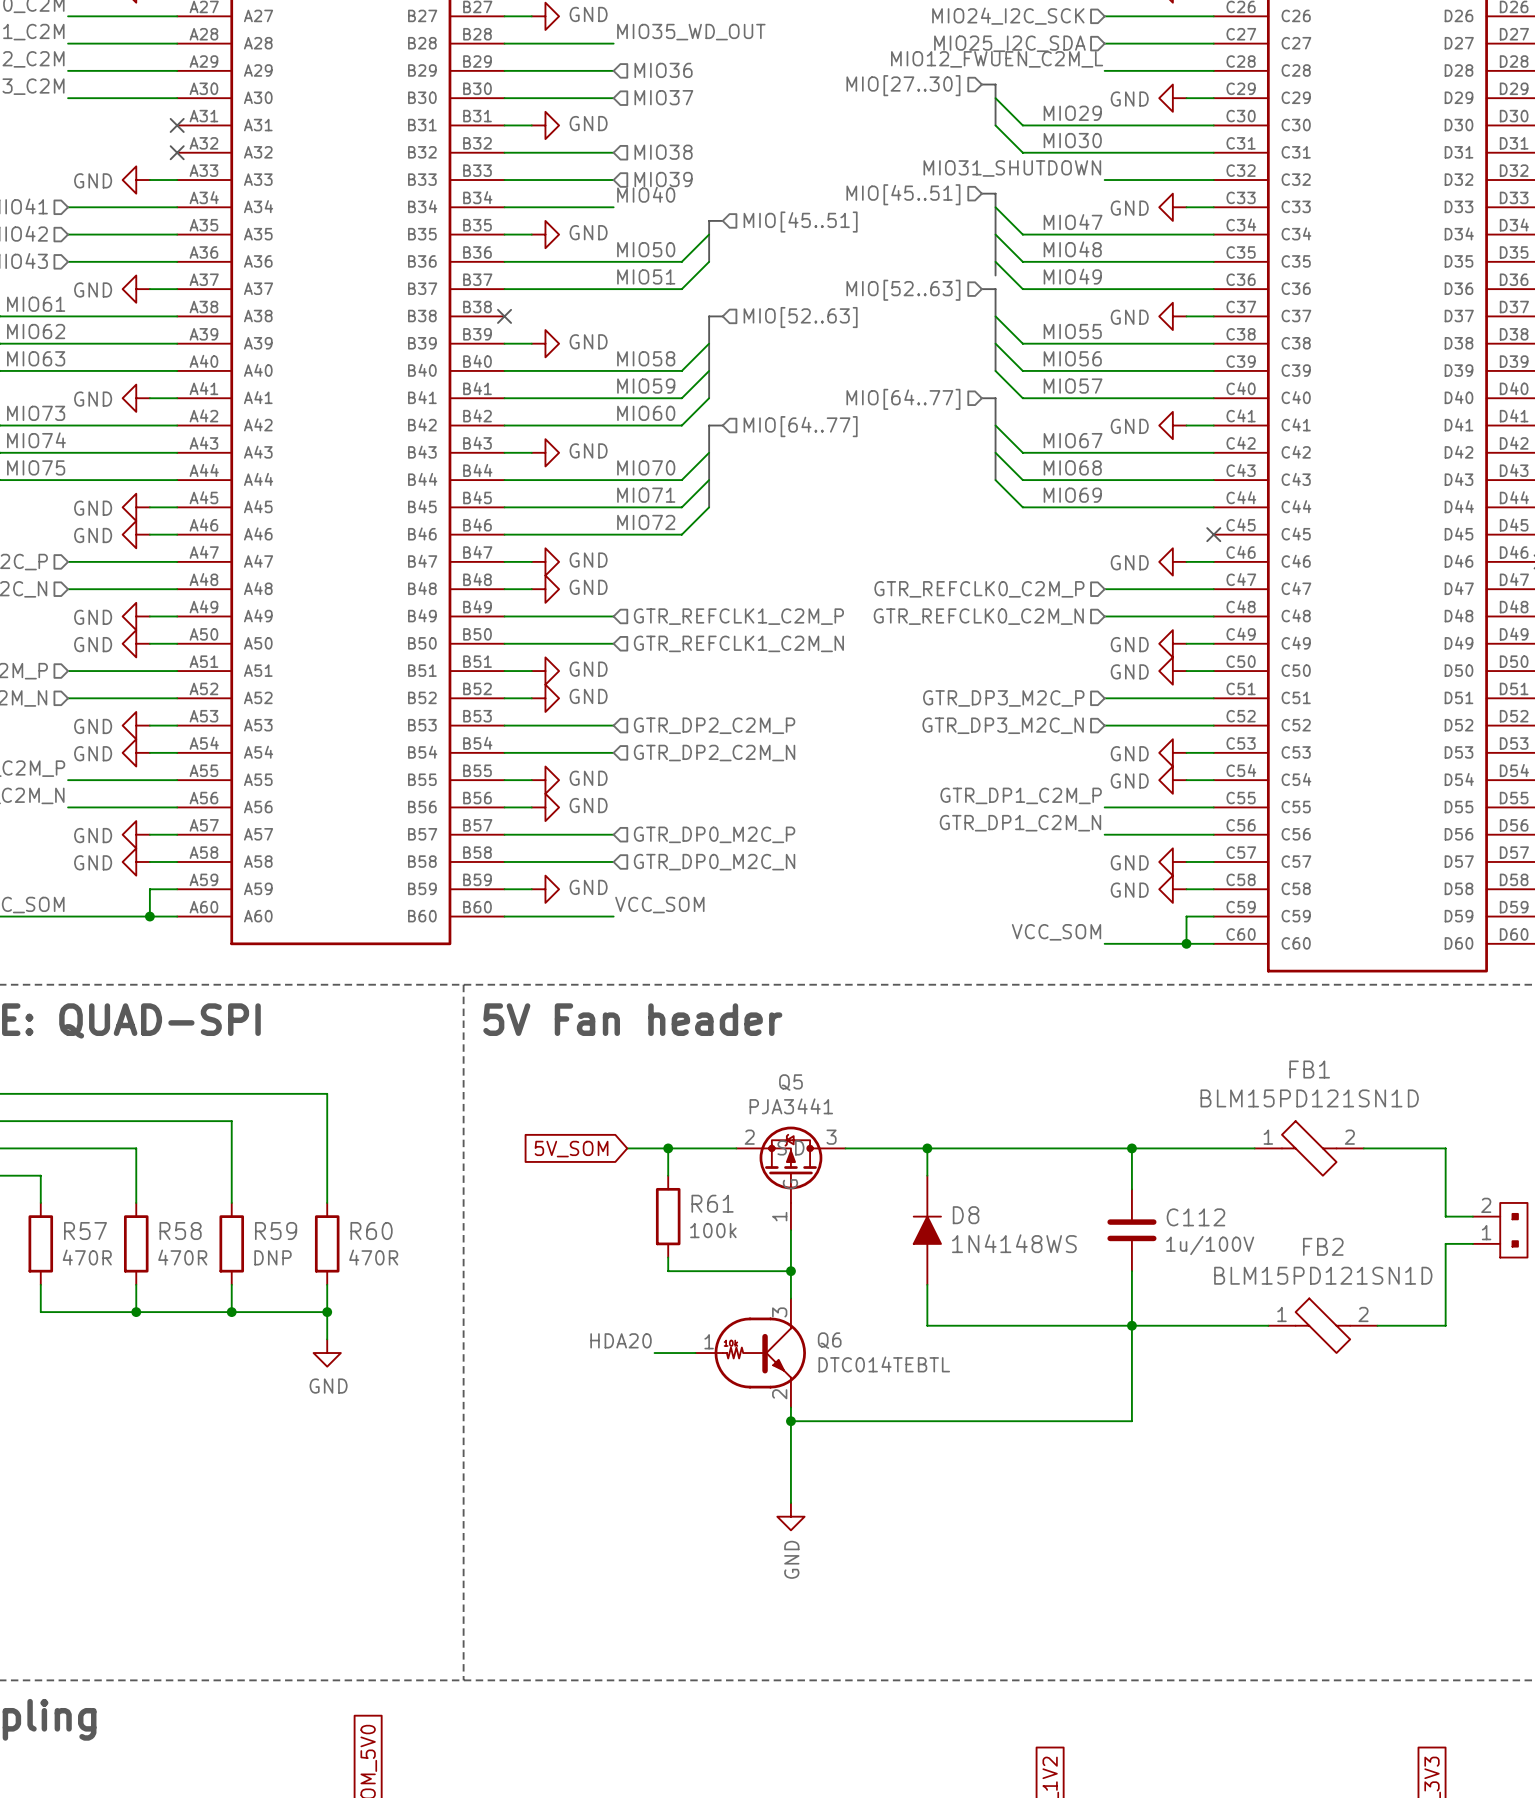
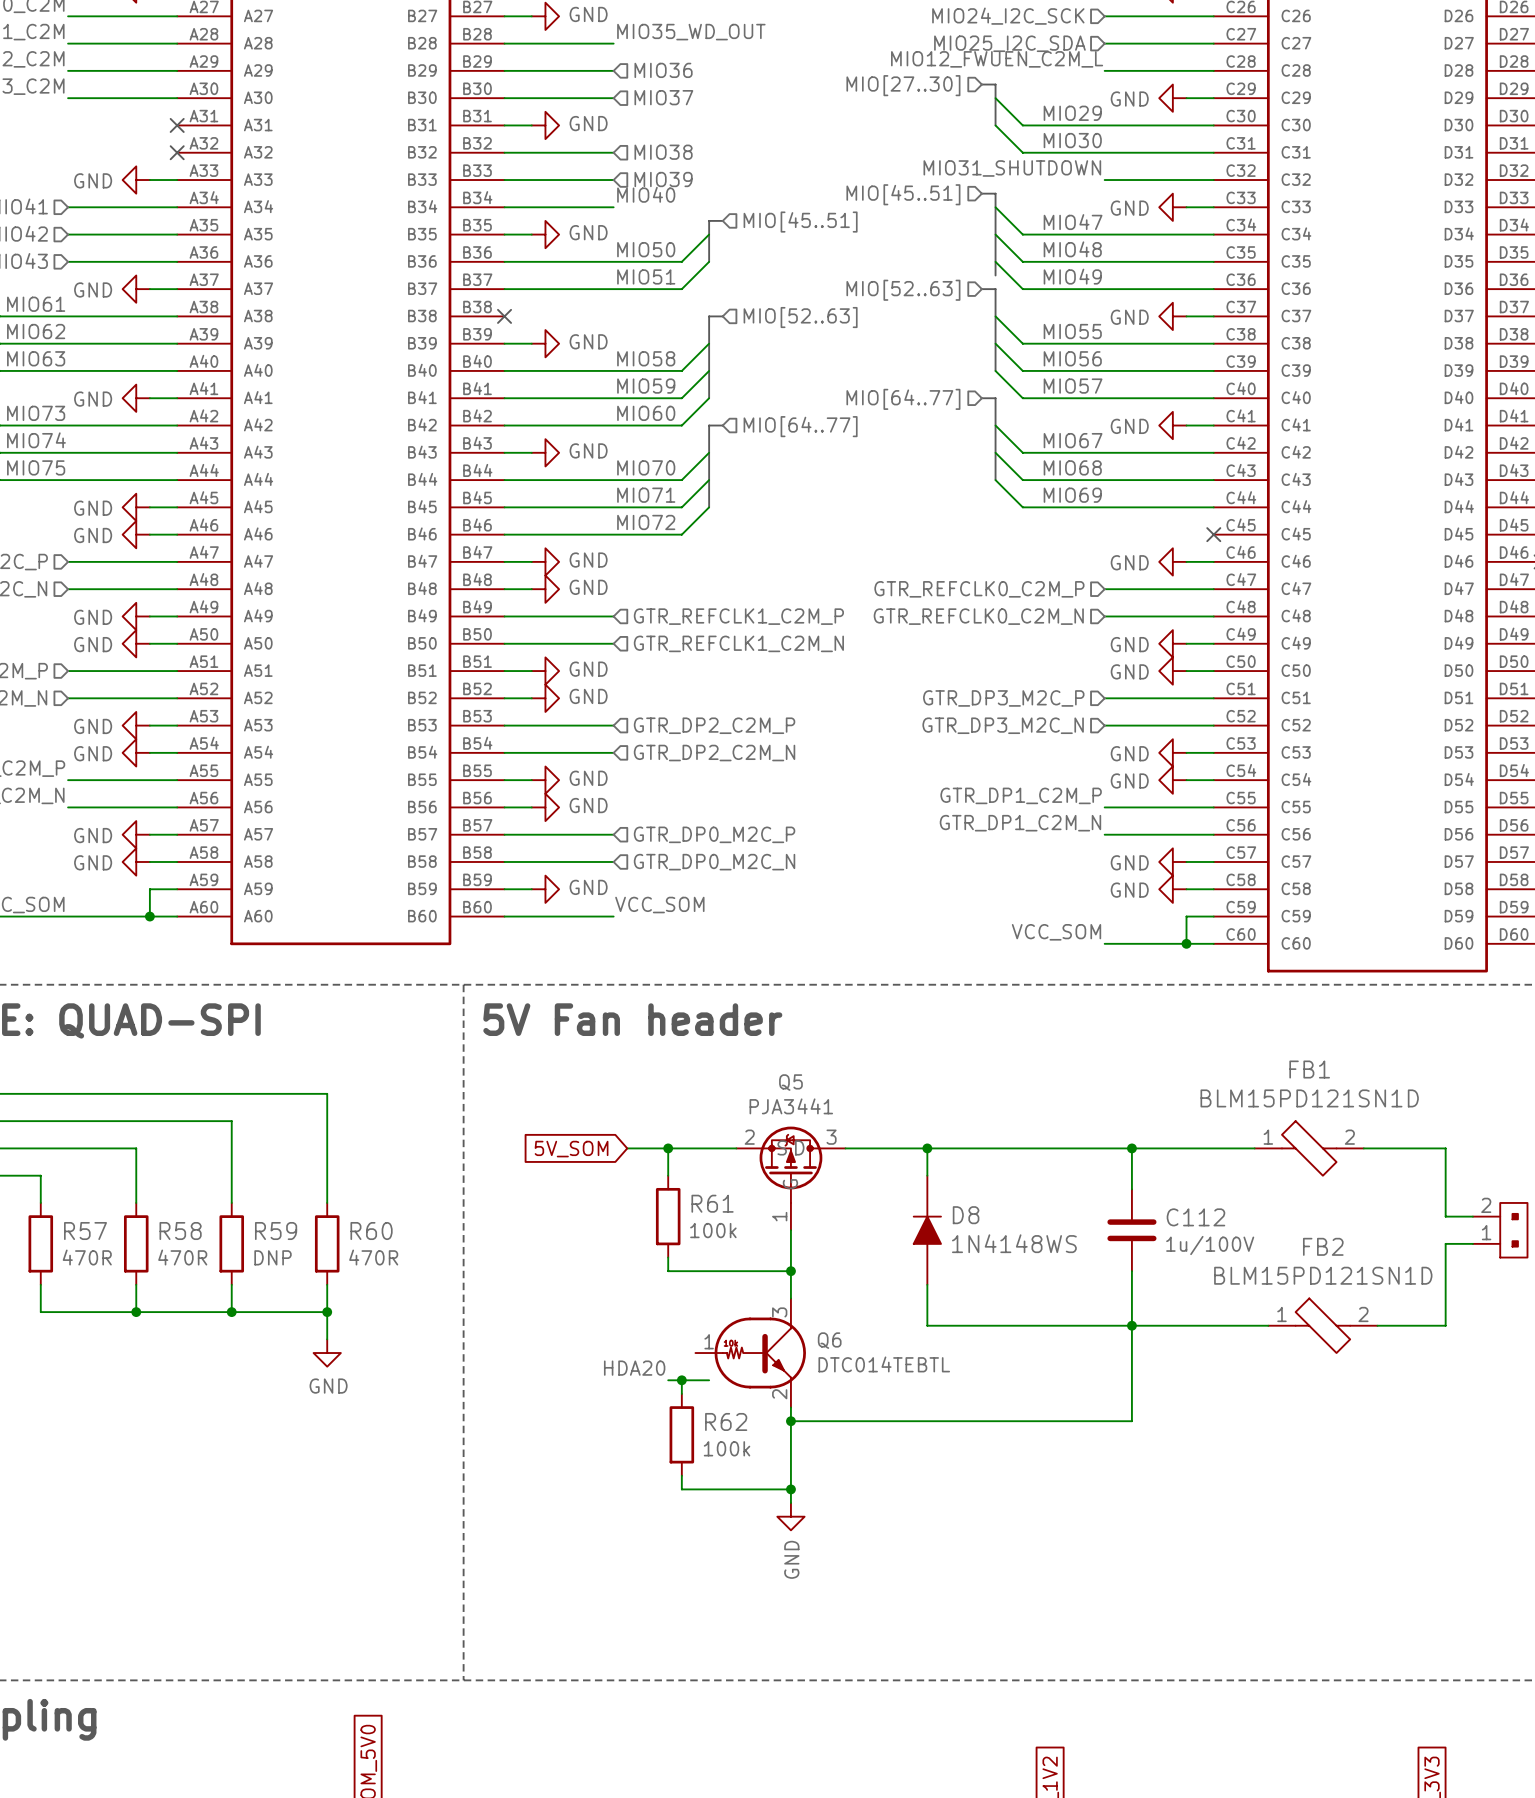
label position: HDA20 (621, 1340) -> HDA20 (634, 1368)
wire: (654, 1353) (695, 1353) -> (668, 1380) (709, 1380)
wire: none -> (681, 1380) (681, 1393)
junction: none -> (681, 1380)
R62: none -> (681, 1434)
wire: none -> (681, 1475) (681, 1489) (790, 1489)
junction: none -> (790, 1489)

